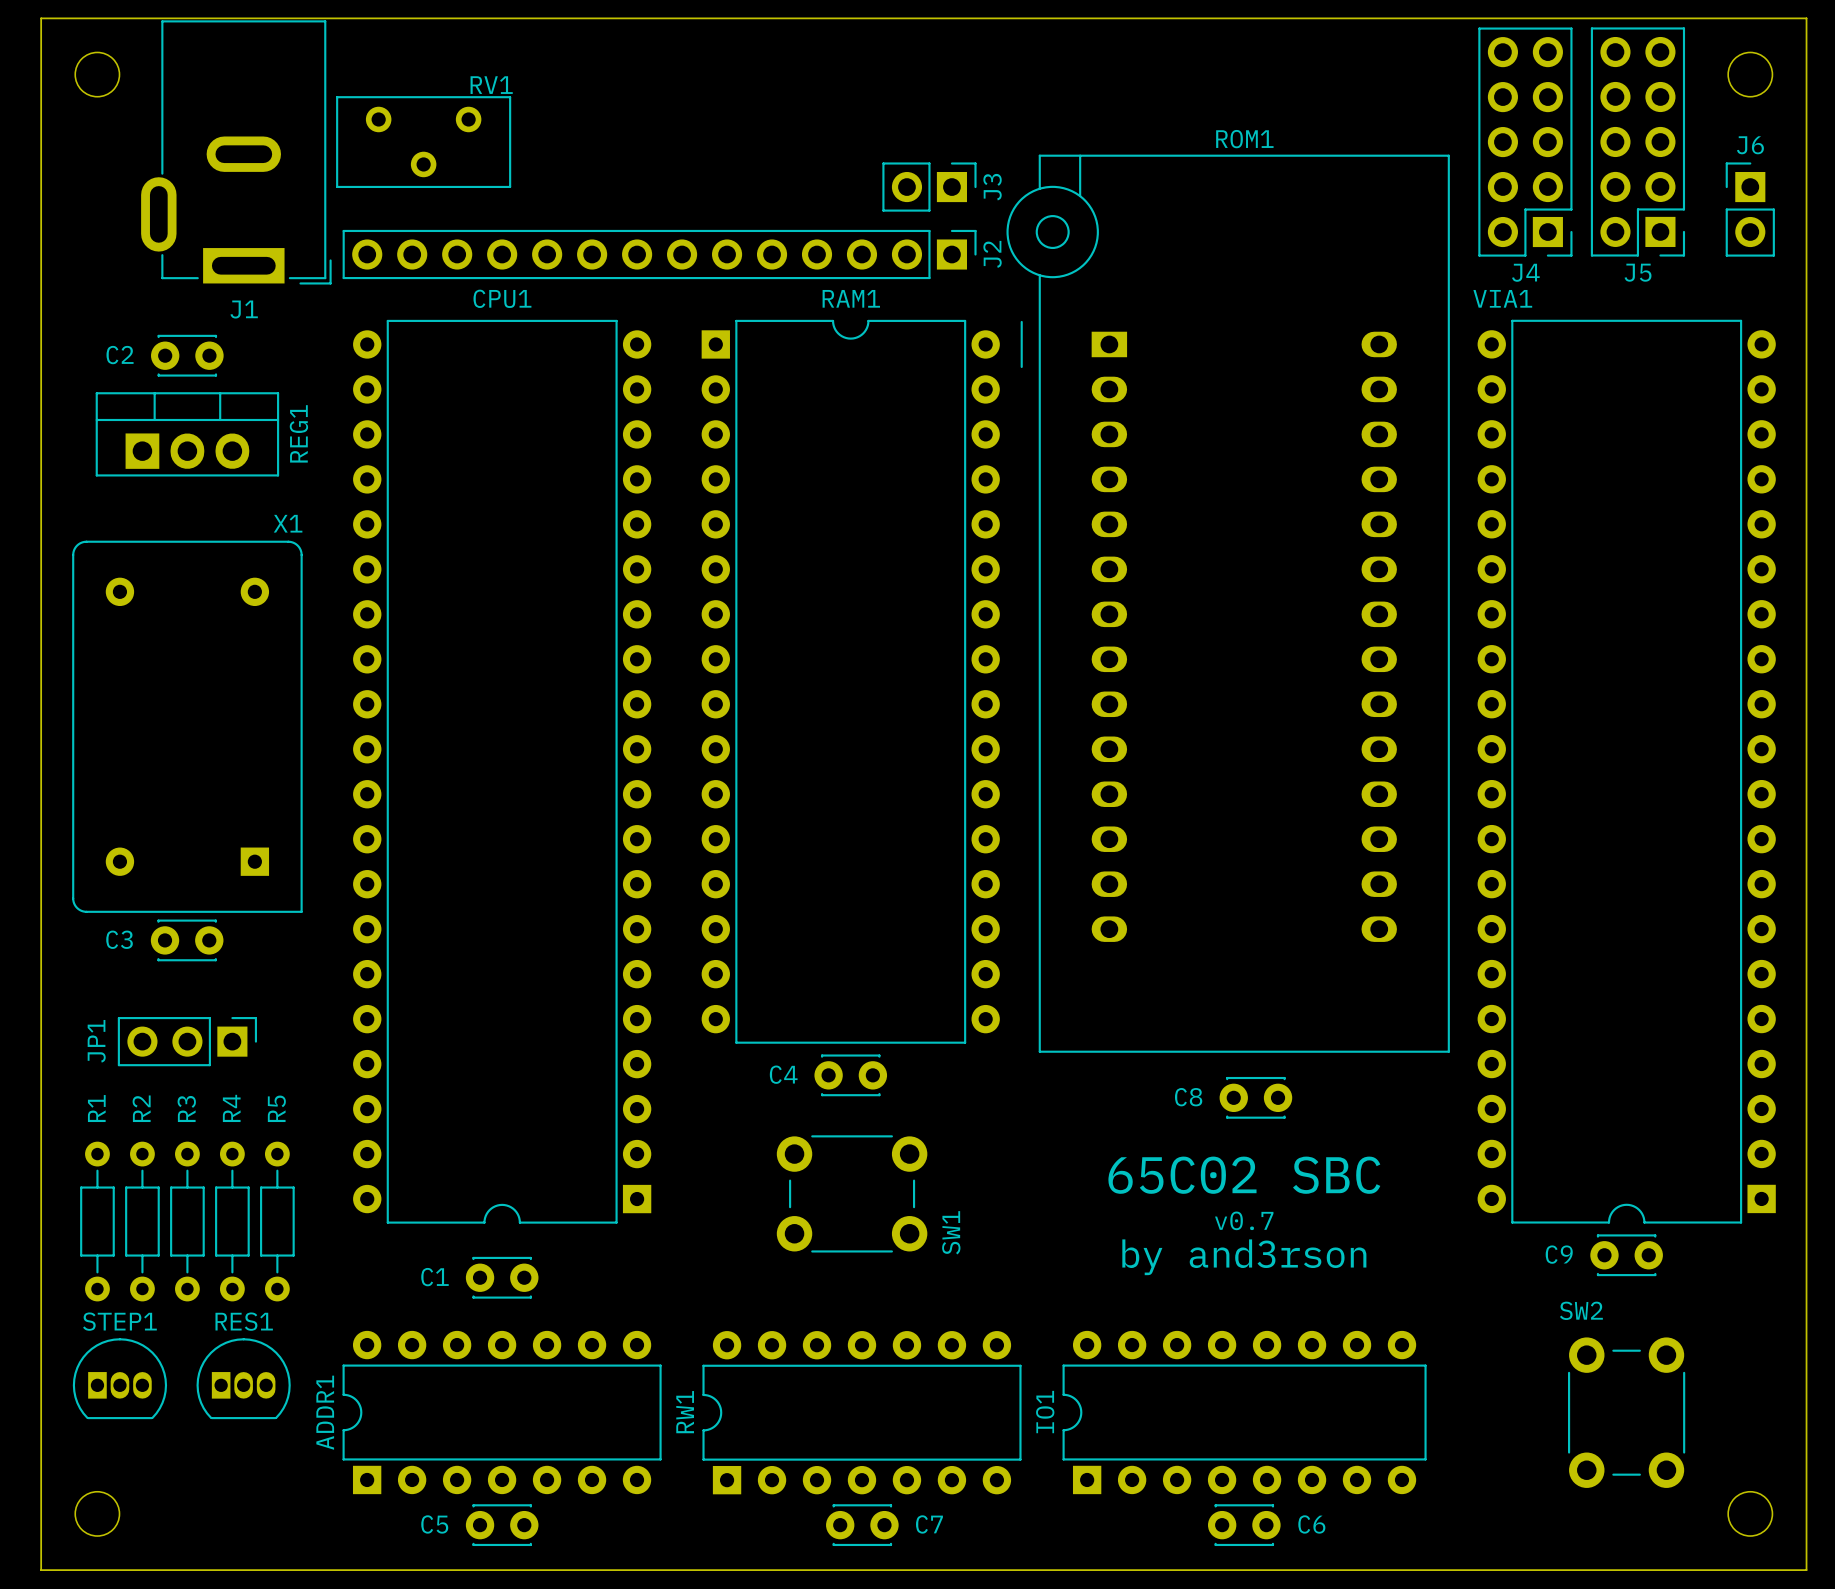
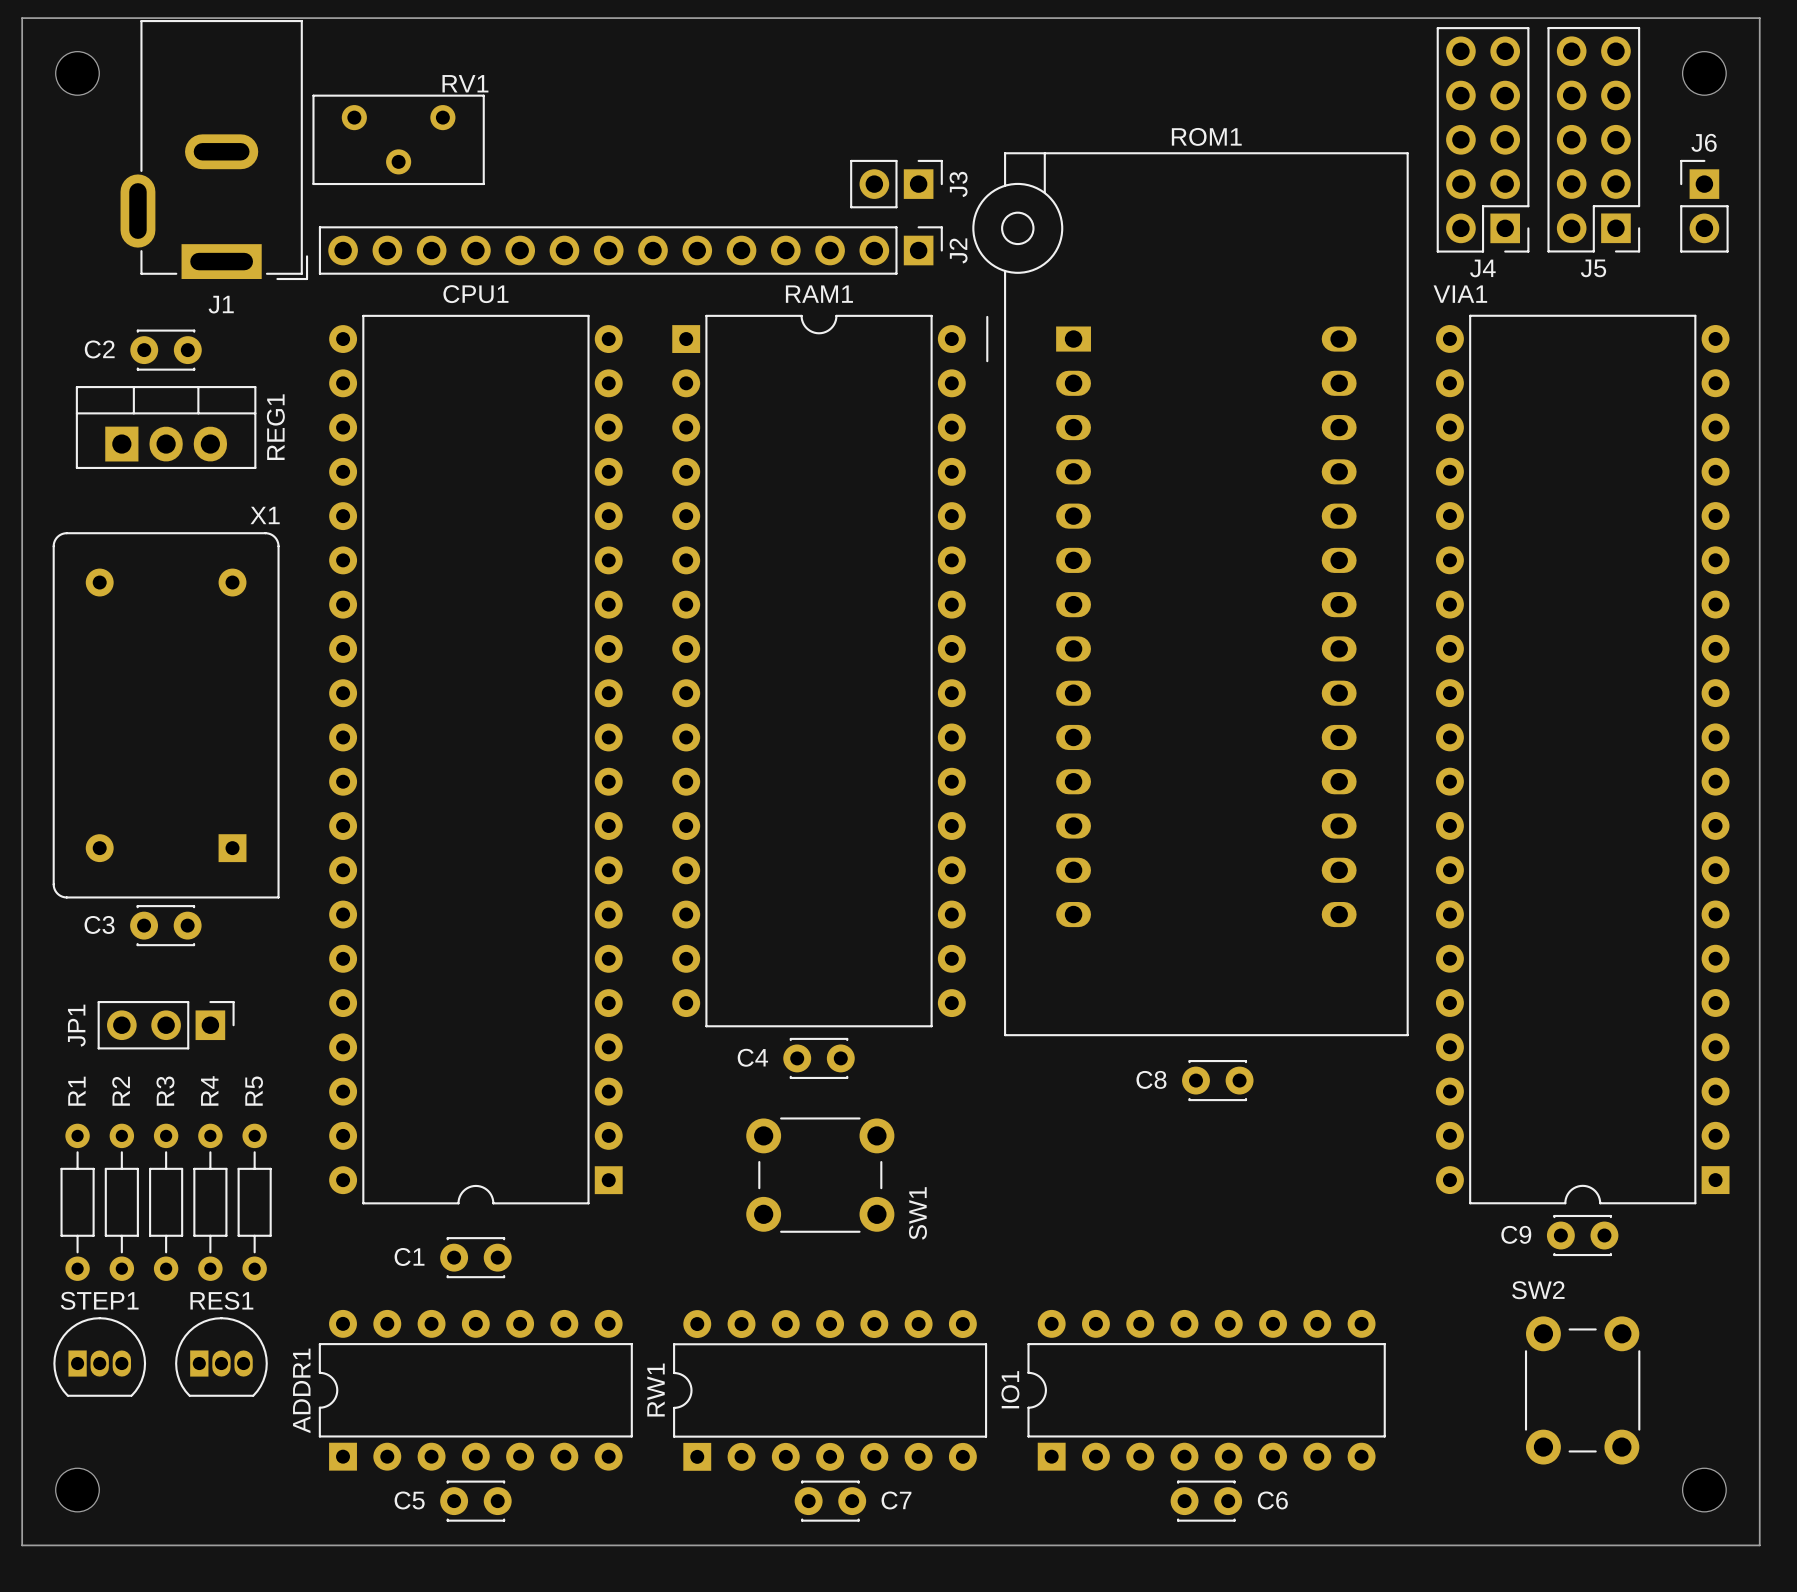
text: 65C02 SBC (1244, 1175) -> none
text: v0.7 (1244, 1220) -> none
text: by and3rson (1244, 1257) -> none

